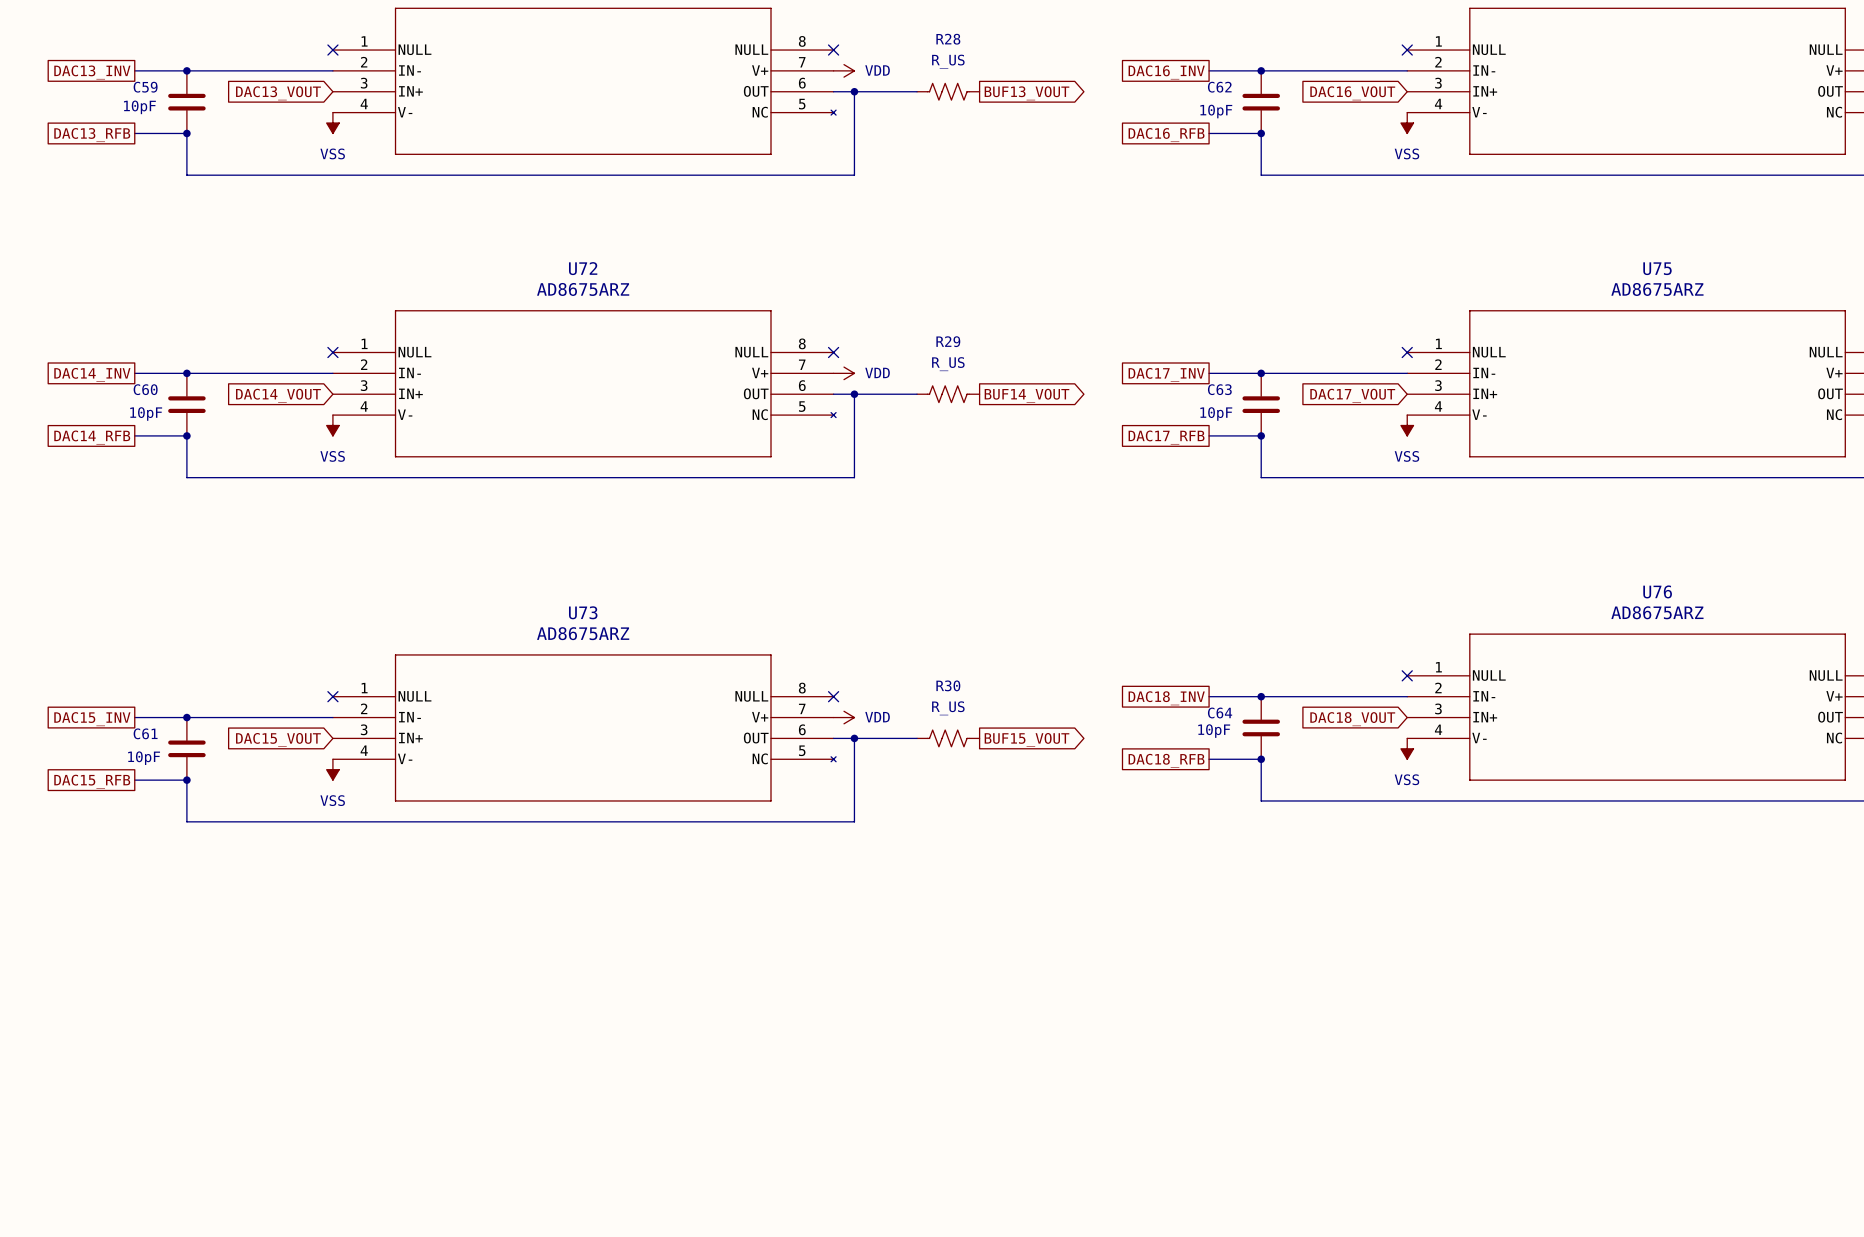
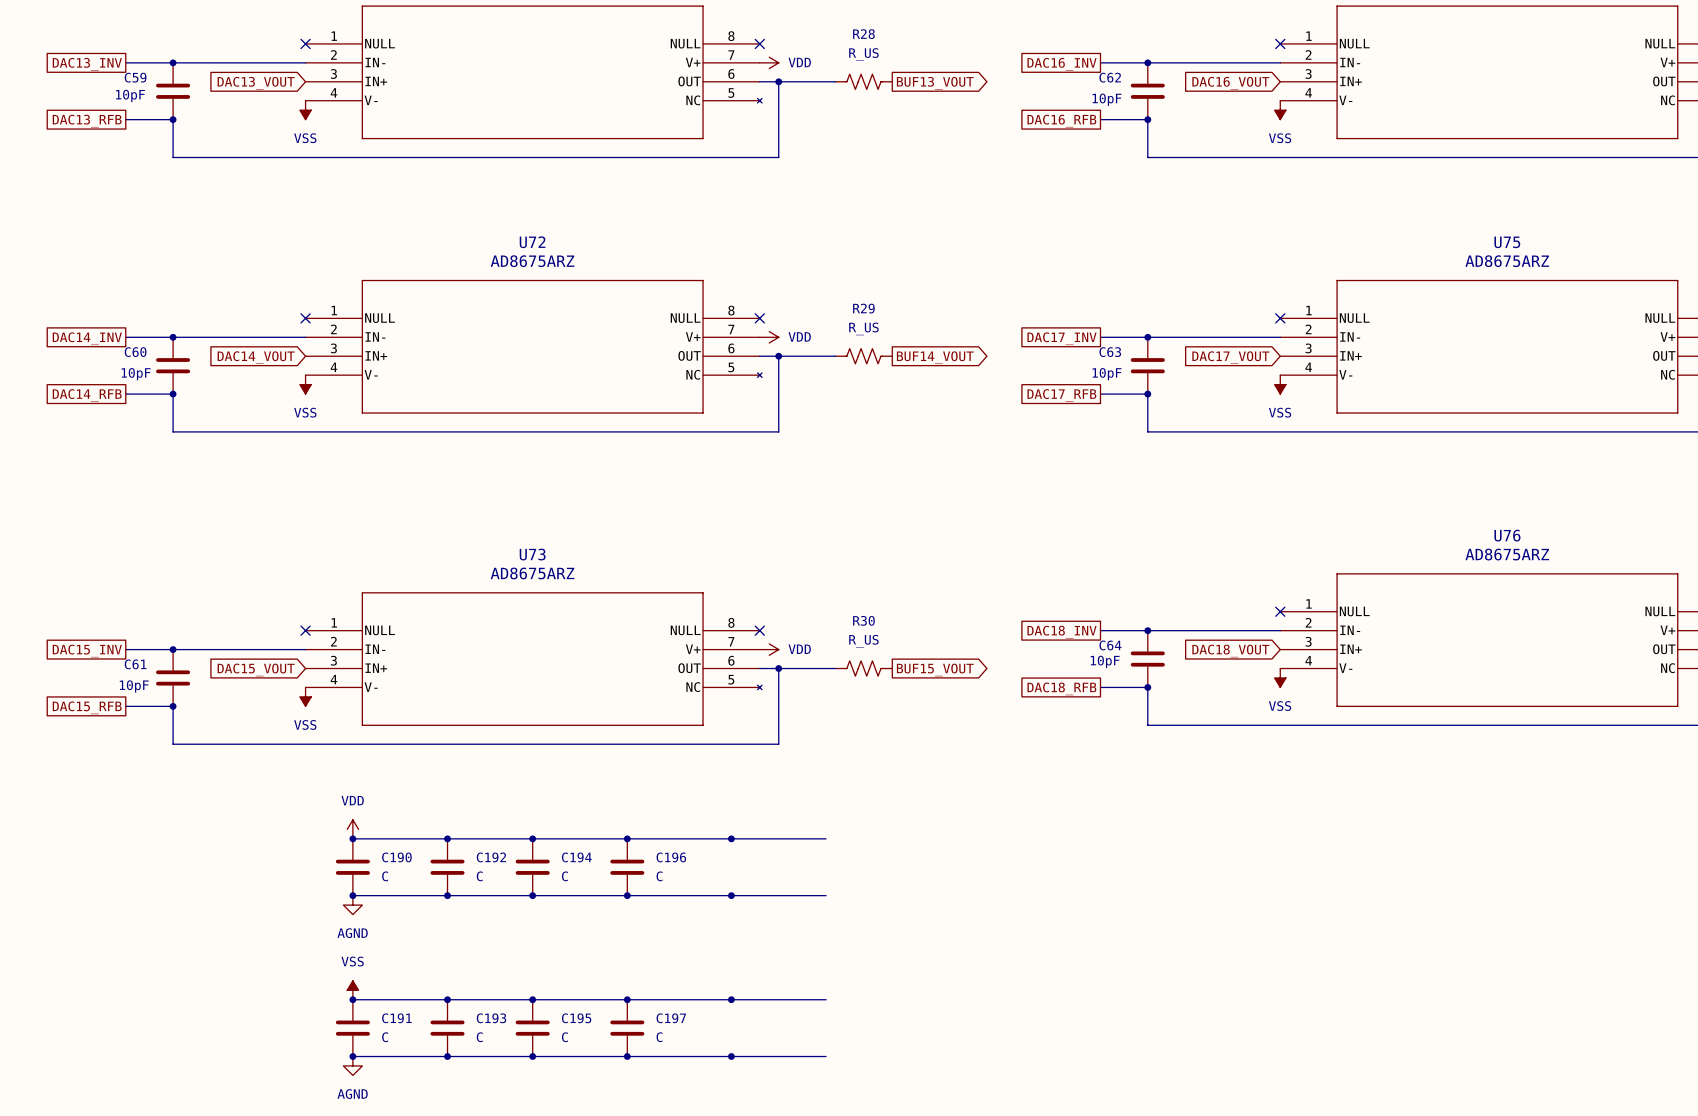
power symbol: none -> VDD (352, 829)
wire: none -> (352, 838) (826, 838)
junction: none -> (352, 838)
junction: none -> (447, 838)
junction: none -> (532, 838)
junction: none -> (627, 838)
junction: none -> (731, 838)
C190: none -> C (352, 867)
C192: none -> C (447, 867)
C194: none -> C (532, 867)
C196: none -> C (627, 867)
wire: none -> (352, 895) (826, 895)
junction: none -> (352, 895)
junction: none -> (447, 895)
junction: none -> (532, 895)
junction: none -> (627, 895)
junction: none -> (731, 895)
power symbol: none -> AGND (352, 905)
power symbol: none -> VSS (352, 990)
wire: none -> (352, 999) (826, 999)
junction: none -> (352, 999)
junction: none -> (447, 999)
junction: none -> (532, 999)
junction: none -> (627, 999)
junction: none -> (731, 999)
C191: none -> C (352, 1028)
C193: none -> C (447, 1028)
C195: none -> C (532, 1028)
C197: none -> C (627, 1028)
wire: none -> (352, 1056) (826, 1056)
junction: none -> (352, 1056)
junction: none -> (447, 1056)
junction: none -> (532, 1056)
junction: none -> (627, 1056)
junction: none -> (731, 1056)
power symbol: none -> AGND (352, 1065)

